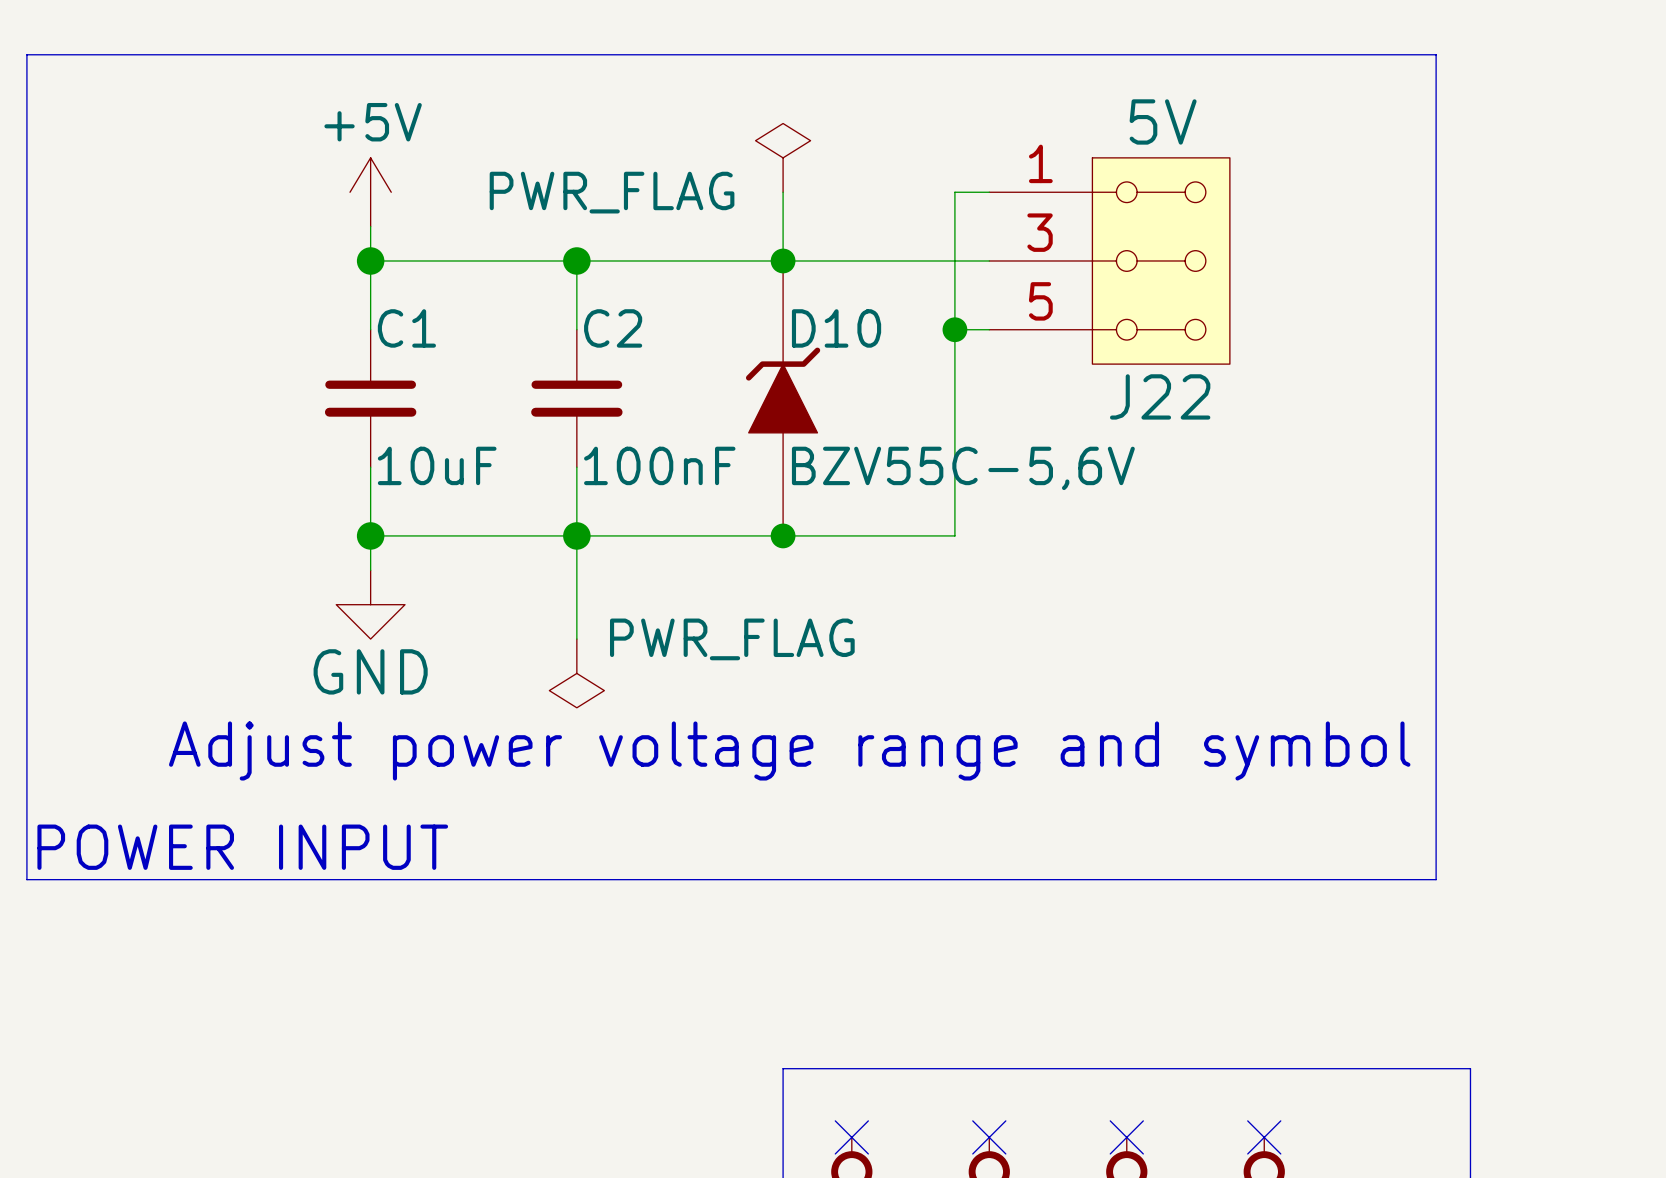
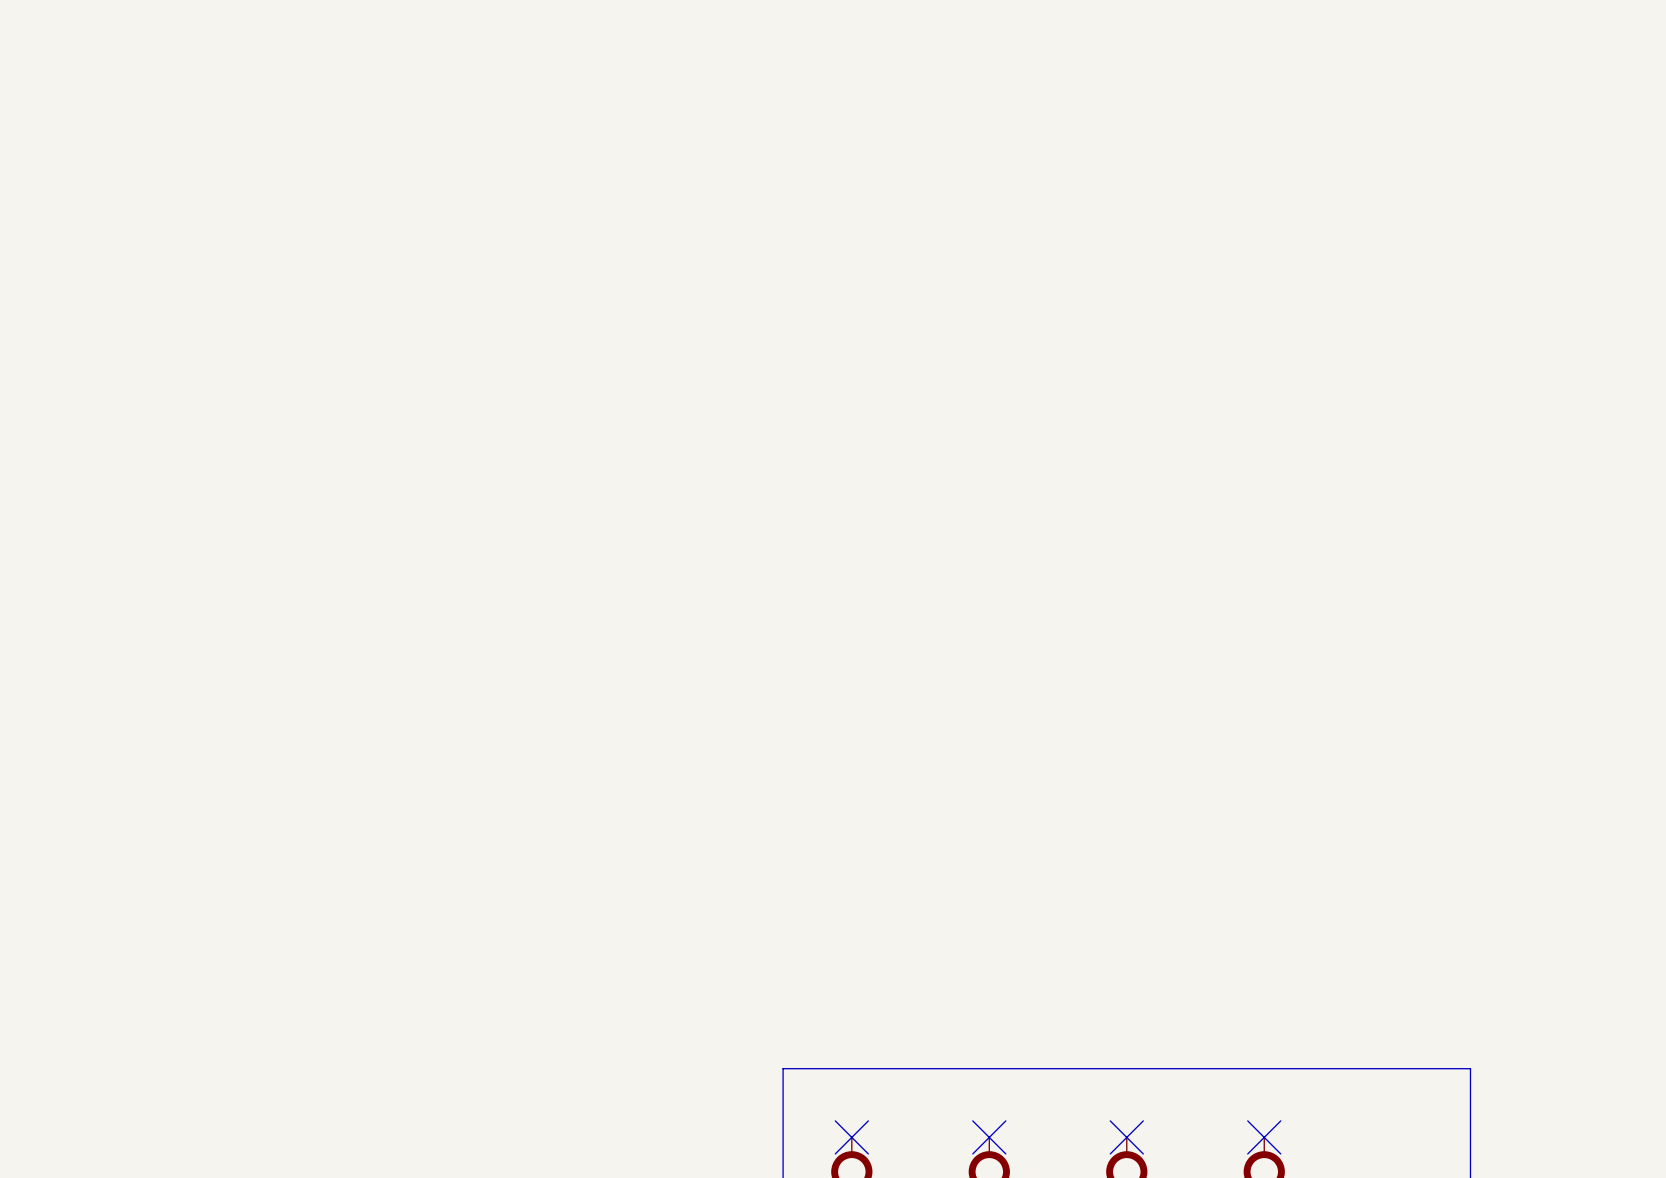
line: (26, 54) (26, 879) (1436, 879) (1436, 54) (26, 54) -> none
power symbol: PWR_FLAG (783, 157) -> none
power symbol: +5V (370, 192) -> none
wire: (783, 192) (783, 260) -> none
wire: (989, 192) (954, 192) (954, 535) (370, 535) -> none
wire: (370, 226) (370, 329) -> none
wire: (370, 260) (989, 260) -> none
junction: (370, 260) -> none
wire: (576, 260) (576, 329) -> none
junction: (576, 260) -> none
junction: (783, 260) -> none
J22: 5V (1109, 260) -> none
wire: (954, 329) (989, 329) -> none
junction: (954, 329) -> none
C1: 10uF (370, 398) -> none
C2: 100nF (576, 398) -> none
D10: BZV55C-5,6V (783, 398) -> none
wire: (370, 467) (370, 570) -> none
wire: (576, 467) (576, 639) -> none
junction: (370, 535) -> none
junction: (576, 535) -> none
junction: (783, 535) -> none
power symbol: GND (370, 604) -> none
power symbol: PWR_FLAG (576, 673) -> none
text: Adjust power voltage range and symbol (789, 750) -> none
text: POWER INPUT (242, 847) -> none

